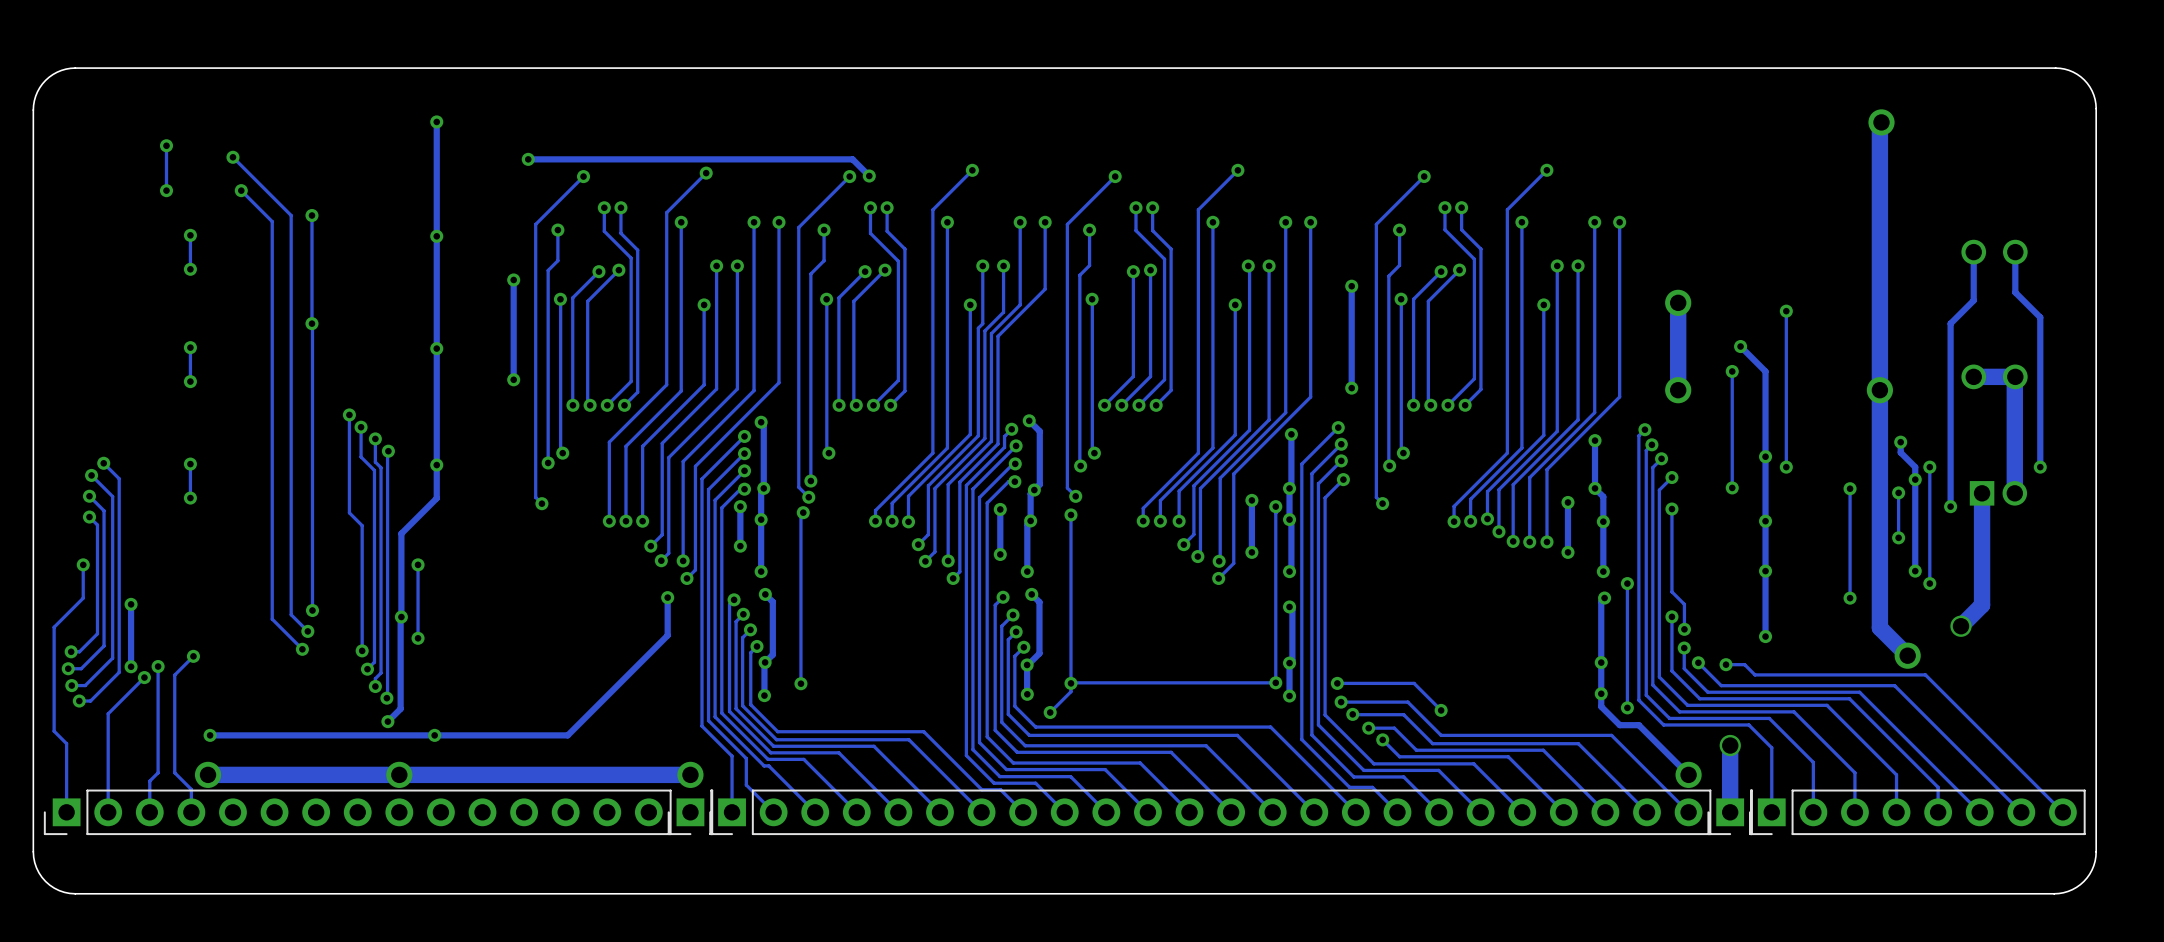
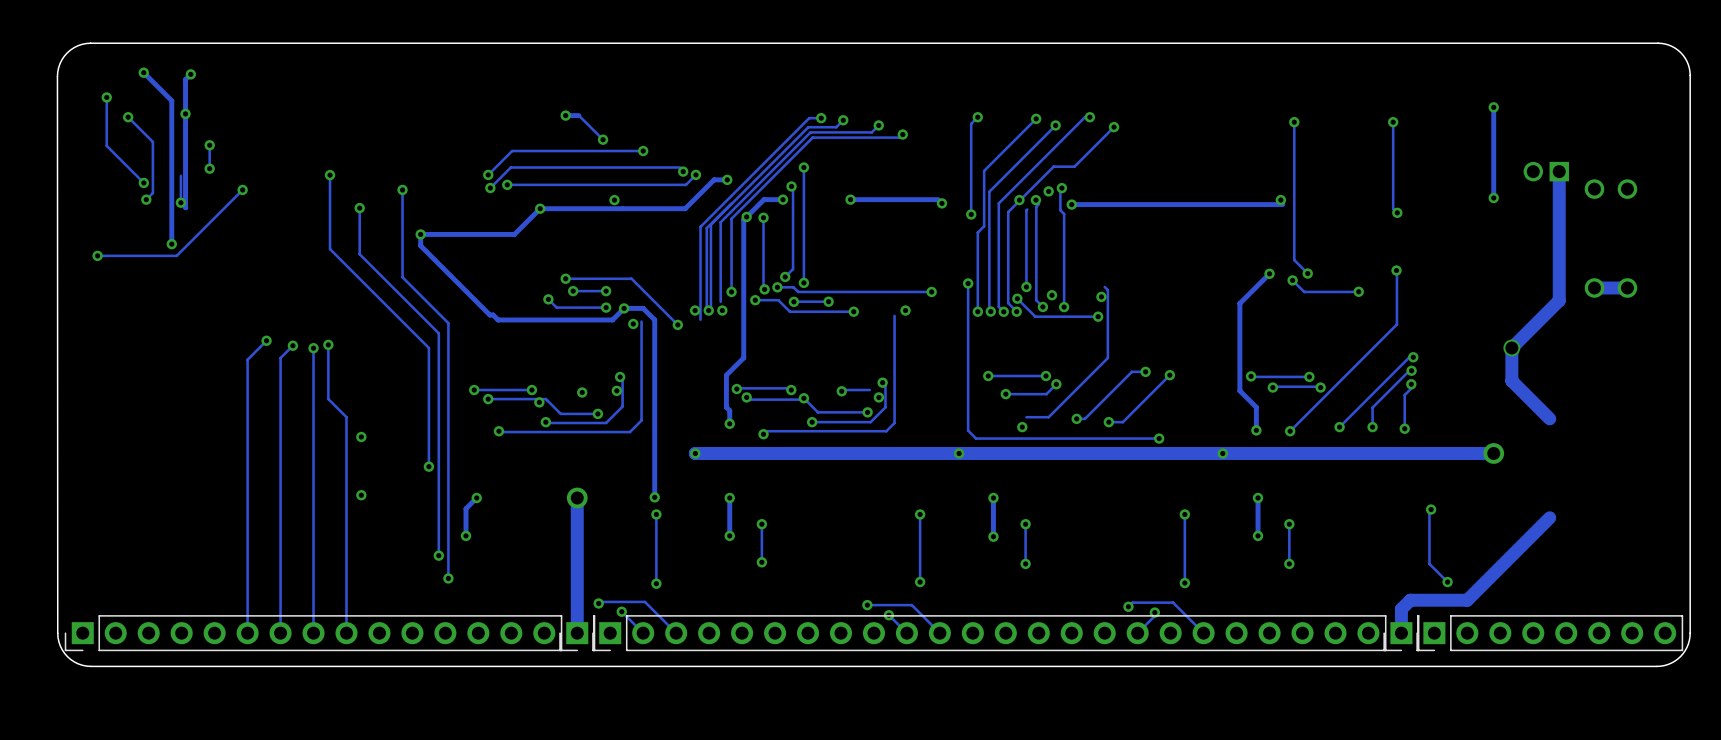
board edge: (2053, 68) (2069, 70) (2084, 79) (2092, 91) (2096, 108) (2096, 851) (2093, 865) (2089, 874) (2080, 884) (2072, 889) (2054, 893) (75, 893) (59, 890) (45, 881) (36, 867) (33, 851) (33, 110) (35, 96) (45, 80) (61, 70) (76, 68) -> (1658, 43) (1668, 45) (1680, 52) (1688, 64) (1690, 75) (1690, 633) (1686, 647) (1680, 656) (1671, 663) (1656, 666) (91, 666) (78, 663) (64, 653) (58, 641) (57, 633) (57, 76) (59, 63) (67, 52) (77, 45) (90, 43)
track: none -> (143, 72) (171, 100) (171, 244)
via: none -> (143, 72)
track: none -> (190, 74) (185, 79) (185, 207)
via: none -> (190, 74)
track: (436, 121) (436, 498) (401, 533) (400, 708) (387, 721) -> none
via: (436, 121) -> none
track: (1881, 122) (1879, 124) (1879, 627) (1907, 655) -> none
via: (1881, 122) -> none
track: none -> (106, 97) (106, 145) (143, 182)
via: none -> (106, 97)
track: (166, 145) (166, 190) -> none
via: (166, 145) -> none
track: none -> (1493, 107) (1493, 197)
via: none -> (1493, 107)
via: none -> (185, 113)
track: (232, 157) (291, 215) (291, 614) (307, 631) -> none
via: (232, 157) -> none
via: (528, 159) -> none
track: (675, 159) (528, 159) -> none
via: none -> (565, 115)
track: (692, 159) (852, 159) (869, 176) -> (578, 115) (603, 139)
track: none -> (128, 117) (152, 141) (152, 193) (146, 199)
via: none -> (128, 117)
track: none -> (977, 117) (971, 123) (971, 214)
via: none -> (977, 117)
track: none -> (1089, 117) (1084, 117) (998, 203) (998, 306) (1003, 311)
via: none -> (1089, 117)
track: none -> (821, 118) (809, 118) (700, 226) (700, 319)
via: none -> (821, 118)
track: none -> (1036, 118) (984, 170) (984, 226) (977, 232) (977, 311)
via: none -> (1036, 118)
track: none -> (843, 120) (836, 127) (808, 127) (710, 224) (711, 312)
via: none -> (843, 120)
track: none -> (1294, 122) (1294, 260) (1307, 273)
via: none -> (1294, 122)
track: none -> (1393, 122) (1393, 208) (1397, 212)
via: none -> (1393, 122)
track: (972, 170) (932, 209) (932, 453) (875, 510) (875, 521) -> none
via: (972, 170) -> none
track: (1237, 170) (1198, 209) (1198, 453) (1143, 508) (1143, 521) -> none
via: (1237, 170) -> none
track: (1546, 170) (1507, 209) (1507, 453) (1454, 506) (1454, 521) -> none
via: (1546, 170) -> none
track: none -> (878, 125) (871, 132) (810, 132) (720, 222) (720, 301)
via: none -> (878, 125)
track: none -> (1055, 125) (989, 191) (990, 311)
via: none -> (1055, 125)
track: (706, 173) (666, 212) (666, 384) (609, 442) (609, 521) -> none
via: (706, 173) -> none
track: none -> (1114, 127) (1074, 166) (1053, 166) (1008, 212) (1008, 303) (1016, 311)
via: none -> (1114, 127)
track: (583, 176) (535, 224) (535, 497) (541, 503) -> none
via: (583, 176) -> none
track: (849, 176) (798, 227) (798, 487) (808, 497) -> none
via: (849, 176) -> none
via: (869, 176) -> none
track: (1115, 176) (1067, 224) (1067, 488) (1075, 496) -> none
via position: (1115, 176) -> (902, 134)
track: (1424, 176) (1376, 224) (1376, 497) (1382, 503) -> none
via: (1424, 176) -> none
track: none -> (902, 134) (899, 137) (812, 137) (731, 218) (731, 291)
via: none -> (603, 139)
via: (166, 190) -> none
track: (241, 190) (272, 221) (272, 619) (302, 649) -> none
via position: (241, 190) -> (209, 145)
track: none -> (209, 145) (209, 168)
track: none -> (643, 151) (512, 151) (488, 174)
via: none -> (643, 151)
track: (604, 207) (604, 231) (631, 258) (631, 381) (607, 405) -> none
via: (604, 207) -> none
track: (620, 207) (620, 233) (637, 250) (637, 392) (624, 405) -> none
via: (620, 207) -> none
track: (870, 207) (870, 233) (898, 261) (898, 380) (873, 405) -> none
via: (870, 207) -> none
track: (887, 207) (887, 231) (904, 249) (904, 391) (890, 405) -> none
via: (887, 207) -> none
track: (1135, 207) (1135, 230) (1164, 259) (1164, 379) (1138, 405) -> none
via: (1135, 207) -> none
track: (1152, 207) (1152, 230) (1171, 249) (1171, 390) (1156, 405) -> none
via: (1152, 207) -> none
track: (1444, 207) (1444, 229) (1474, 259) (1474, 378) (1447, 405) -> none
via: (1444, 207) -> none
track: (1461, 207) (1461, 229) (1480, 249) (1480, 389) (1465, 405) -> none
via: (1461, 207) -> none
track: (311, 215) (312, 610) -> none
via: (311, 215) -> none
track: (681, 222) (681, 391) (625, 446) (625, 521) -> none
via: (681, 222) -> none
track: (754, 222) (754, 390) (683, 461) (683, 560) -> none
via: (754, 222) -> none
track: (778, 222) (778, 382) (695, 466) (695, 570) (686, 578) -> none
via: (778, 222) -> none
track: (947, 222) (947, 448) (892, 503) (892, 521) -> none
via: (947, 222) -> none
track: (1020, 222) (1020, 304) (991, 333) (991, 441) (948, 484) (948, 560) -> none
via: (1020, 222) -> none
track: (1045, 222) (1045, 289) (998, 336) (998, 443) (959, 482) (959, 571) (953, 578) -> none
via: (1045, 222) -> none
track: (1212, 222) (1212, 448) (1160, 500) (1160, 521) -> none
via: (1212, 222) -> none
track: (1285, 222) (1285, 412) (1220, 478) (1219, 561) -> none
via: (1285, 222) -> none
track: (1310, 222) (1310, 397) (1233, 473) (1233, 563) (1218, 578) -> none
via: (1310, 222) -> none
track: (1521, 222) (1521, 447) (1470, 499) (1470, 521) -> none
via: (1521, 222) -> none
track: (1594, 222) (1594, 412) (1529, 477) (1529, 541) -> none
via: (1594, 222) -> none
track: (1619, 222) (1619, 396) (1546, 469) (1546, 541) -> none
via: (1619, 222) -> none
track: none -> (680, 167) (510, 167) (490, 188)
track: none -> (803, 167) (803, 282)
via: none -> (803, 167)
via: none -> (209, 168)
track: (557, 230) (557, 260) (548, 270) (548, 462) -> none
via: (557, 230) -> none
track: (824, 230) (824, 260) (810, 273) (810, 481) -> none
track: (1089, 230) (1089, 265) (1079, 275) (1080, 465) -> none
via: (1089, 230) -> none
track: (1399, 230) (1399, 265) (1388, 276) (1389, 465) -> none
via: (1399, 230) -> none
track: none -> (1559, 171) (1559, 300) (1511, 347) (1511, 380) (1549, 418)
track: none -> (330, 175) (330, 249) (428, 347) (428, 466)
via: none -> (330, 175)
via: none -> (488, 174)
track: none -> (695, 174) (685, 184) (507, 184)
via: none -> (695, 174)
via: (190, 235) -> none
via: (436, 236) -> none
track: none -> (727, 179) (714, 179) (685, 208) (540, 208) (514, 234) (420, 234) (420, 245) (489, 315) (493, 315) (498, 319) (612, 319) (624, 308) (643, 308) (654, 319) (654, 497)
via: none -> (727, 179)
via: none -> (143, 182)
via: none -> (507, 184)
track: none -> (791, 186) (793, 269) (785, 276)
via: none -> (791, 186)
via: none -> (490, 188)
track: none -> (1061, 188) (1060, 210) (1064, 214) (1064, 307)
via: none -> (1061, 188)
track: (1973, 252) (1973, 300) (1950, 323) (1950, 506) -> none
track: (2015, 252) (2015, 292) (2040, 317) (2040, 467) -> none
track: none -> (242, 189) (176, 255) (97, 255)
via: none -> (242, 189)
track: none -> (402, 189) (402, 277) (448, 323) (448, 578)
via: none -> (402, 189)
via: none -> (1048, 191)
via: none -> (1493, 197)
via: none -> (146, 199)
track: (716, 265) (716, 388) (662, 443) (662, 534) (650, 546) -> none
via: (716, 265) -> none
track: (737, 265) (737, 388) (668, 457) (668, 553) (661, 560) -> none
track: none -> (782, 199) (763, 199) (743, 219) (743, 357) (726, 375) (726, 407) (729, 410) (729, 423)
via: none -> (782, 199)
track: (982, 265) (982, 323) (978, 328) (978, 435) (928, 485) (928, 534) (918, 544) -> none
via: (982, 265) -> none
track: (1003, 265) (1003, 312) (984, 330) (984, 438) (934, 488) (934, 551) (925, 561) -> none
via: (1003, 265) -> none
via: none -> (850, 199)
track: none -> (938, 199) (850, 199)
track: (1248, 265) (1249, 430) (1193, 485) (1193, 534) (1183, 544) -> none
track: (1269, 265) (1269, 419) (1200, 488) (1200, 553) (1197, 556) -> none
track: (1557, 265) (1557, 431) (1498, 489) (1498, 531) -> none
via: (1557, 265) -> none
track: (1578, 265) (1578, 419) (1513, 484) (1513, 541) -> none
track: (618, 270) (587, 301) (587, 402) (590, 405) -> none
via: (618, 270) -> none
via: (885, 270) -> none
track: (1150, 270) (1150, 376) (1121, 405) -> none
track: (1459, 270) (1428, 301) (1428, 402) (1430, 405) -> none
via: (1459, 270) -> none
track: (598, 271) (572, 297) (572, 405) -> none
via: (598, 271) -> none
track: (865, 271) (838, 297) (838, 405) -> none
via: (865, 271) -> none
track: (1133, 271) (1133, 376) (1104, 405) -> none
via: (1133, 271) -> none
track: none -> (1039, 204) (1036, 206) (1036, 300) (1042, 306)
via: none -> (1071, 204)
track: (1441, 271) (1413, 299) (1413, 405) -> none
via: (1441, 271) -> none
track: none -> (1282, 204) (1071, 204)
track: none -> (359, 208) (359, 254) (438, 333) (438, 555)
via: none -> (359, 208)
via: none -> (540, 208)
track: none -> (1027, 209) (1026, 287)
track: (513, 279) (513, 379) -> none
via: (513, 279) -> none
via: none -> (1397, 212)
via: none -> (971, 214)
track: (1351, 286) (1351, 388) -> none
via: (1351, 286) -> none
via: none -> (746, 216)
track: none -> (763, 217) (764, 289)
via: none -> (763, 217)
track: (560, 299) (560, 451) (562, 453) -> none
via: (560, 299) -> none
track: (826, 299) (826, 451) (828, 453) -> none
via: (826, 299) -> none
track: (1092, 299) (1092, 451) (1094, 453) -> none
via: (1092, 299) -> none
track: (1401, 299) (1401, 451) (1403, 453) -> none
via: (1401, 299) -> none
track: (1678, 302) (1678, 390) -> none
via: (1678, 302) -> none
track: (704, 304) (704, 384) (642, 446) (642, 521) -> none
via: (704, 304) -> none
track: (970, 304) (970, 434) (908, 496) (908, 521) -> none
via: (970, 304) -> none
track: (1235, 304) (1235, 434) (1179, 491) (1179, 521) -> none
via: (1235, 304) -> none
track: (1543, 304) (1543, 435) (1487, 491) (1487, 518) -> none
via: (1543, 304) -> none
via: none -> (420, 234)
track: (1786, 311) (1786, 467) -> none
via: (1786, 311) -> none
via: (311, 323) -> none
via: none -> (97, 255)
track: (1740, 346) (1765, 371) (1765, 636) -> none
via: (1740, 346) -> none
track: (190, 347) (190, 381) -> none
via position: (190, 347) -> (171, 244)
via: (436, 348) -> none
track: none -> (1396, 270) (1396, 324) (1290, 431)
via: none -> (1396, 270)
track: none -> (1269, 273) (1239, 303) (1239, 390) (1256, 407) (1256, 430)
via: none -> (1269, 273)
via: none -> (1307, 273)
via: none -> (785, 276)
track: none -> (565, 278) (631, 278) (677, 324)
via: none -> (565, 278)
track: none -> (1292, 280) (1304, 291) (1358, 291)
via: none -> (1292, 280)
via: none -> (803, 282)
track: none -> (968, 283) (968, 430) (976, 438) (1159, 438)
via: none -> (968, 283)
track: (1732, 371) (1732, 487) -> none
via: (1732, 371) -> none
via: none -> (1026, 287)
track: none -> (1104, 287) (1107, 290) (1107, 358) (1048, 417) (1026, 417)
track: none -> (777, 287) (793, 287) (798, 291) (931, 291)
via: none -> (777, 287)
via size: [1665, 377, 1692, 404] -> [1353, 286, 1364, 297]
track: (2014, 377) (2014, 493) -> none
via: none -> (764, 289)
via: (513, 379) -> none
via: none -> (573, 291)
track: none -> (606, 291) (573, 291)
via: none -> (606, 291)
via: (190, 381) -> none
via: none -> (731, 291)
via: none -> (931, 291)
via: none -> (1051, 295)
track: none -> (1017, 298) (1035, 316) (1098, 316)
via: none -> (1017, 298)
via: (1879, 390) -> none
track: none -> (548, 299) (556, 307) (606, 307)
via: none -> (548, 299)
track: none -> (755, 300) (778, 300) (789, 311) (853, 311)
via: none -> (755, 300)
via: none -> (793, 301)
track: none -> (828, 301) (794, 301)
via: none -> (828, 301)
via: none -> (1042, 306)
via: none -> (1064, 307)
via: none -> (606, 307)
via: none -> (624, 308)
via: (572, 405) -> none
via: (590, 405) -> none
via: (607, 405) -> none
via: (624, 405) -> none
via: (890, 405) -> none
via: (1121, 405) -> none
via: (1138, 405) -> none
via: (1156, 405) -> none
via: (1413, 405) -> none
via: (1430, 405) -> none
via: (1447, 405) -> none
via: (1465, 405) -> none
via: none -> (853, 311)
via: none -> (977, 311)
via: none -> (990, 311)
via: none -> (1003, 311)
via: none -> (1016, 311)
track: none -> (894, 315) (894, 422) (886, 431) (762, 431)
via: none -> (1098, 316)
track: (349, 414) (349, 512) (362, 525) (362, 650) -> none
via: (349, 414) -> none
track: none -> (641, 321) (641, 420) (630, 432) (498, 431)
track: (1029, 420) (1039, 431) (1039, 484) (1030, 493) (1030, 520) (1027, 524) (1027, 571) -> none
via: (1029, 420) -> none
track: (761, 422) (763, 424) (761, 571) -> none
via: none -> (677, 324)
track: (361, 427) (361, 457) (374, 470) (374, 662) (367, 669) -> none
via: (361, 427) -> none
track: (1338, 427) (1301, 464) (1301, 739) (1349, 787) (1372, 787) (1397, 812) -> (1154, 612) (1154, 616) (1137, 633)
via: (1338, 427) -> none
track: (1011, 429) (1004, 436) (1004, 447) (966, 485) (966, 755) (994, 783) (1035, 783) (1064, 812) -> none
via: (1011, 429) -> none
track: (1644, 429) (1638, 435) (1638, 700) (1663, 724) (1748, 724) (1771, 747) (1771, 812) -> none
via: (1644, 429) -> none
track: (1291, 434) (1291, 486) (1289, 488) (1291, 569) (1289, 571) -> none
via: (1291, 434) -> none
track: (744, 436) (701, 478) (701, 726) (732, 756) (732, 812) -> none
via: (744, 436) -> none
track: (375, 438) (375, 462) (381, 467) (381, 672) (375, 678) (375, 686) -> none
via: (375, 438) -> none
track: (1595, 440) (1595, 488) (1603, 496) (1603, 571) -> none
via: (1595, 440) -> none
track: (1900, 442) (1900, 452) (1915, 467) (1915, 571) -> none
via: (1900, 442) -> none
track: none -> (266, 340) (247, 359) (247, 633)
via: none -> (266, 340)
track: (1341, 444) (1311, 473) (1311, 735) (1353, 776) (1403, 776) (1439, 812) -> none
via: (1341, 444) -> none
track: (1651, 444) (1646, 450) (1646, 695) (1669, 718) (1769, 718) (1813, 762) (1813, 812) -> none
via: (1651, 444) -> none
track: (1016, 445) (972, 489) (972, 749) (999, 776) (1070, 776) (1083, 789) -> none
via: (1016, 445) -> none
track: none -> (328, 344) (328, 399) (346, 417) (346, 633)
via: none -> (328, 344)
track: none -> (292, 345) (280, 358) (280, 633)
via: none -> (292, 345)
track: none -> (311, 346) (313, 348) (313, 633)
track: (388, 451) (386, 698) -> none
via: (388, 451) -> none
via: none -> (313, 348)
via: none -> (1511, 347)
via: (562, 453) -> none
track: (744, 453) (708, 489) (708, 720) (746, 758) (746, 785) -> none
via: (744, 453) -> none
via: (828, 453) -> none
via: (1094, 453) -> none
via: (1403, 453) -> none
via: (1765, 456) -> none
track: (1661, 458) (1652, 467) (1652, 685) (1679, 711) (1794, 711) (1854, 772) (1854, 812) -> none
via: (1661, 458) -> none
track: (1341, 460) (1318, 483) (1318, 724) (1363, 770) (1438, 770) (1442, 773) -> (1128, 606) (1132, 602) (1173, 602)
via: (1341, 460) -> none
via: (548, 462) -> none
track: (103, 463) (119, 478) (119, 672) (90, 701) (79, 701) -> none
via: (103, 463) -> none
track: (1015, 463) (979, 497) (979, 742) (1006, 769) (1105, 769) (1112, 776) -> (867, 605) (911, 605)
via: (1015, 463) -> none
track: (190, 464) (190, 498) -> none
via: (190, 464) -> none
track: none -> (1413, 357) (1409, 357) (1339, 427)
via: none -> (1413, 357)
via: (436, 465) -> none
via: (1080, 465) -> none
via: (1389, 465) -> none
via: (1786, 467) -> none
track: (1929, 467) (1929, 583) -> none
via: (1929, 467) -> none
via: (2040, 467) -> none
track: (744, 470) (715, 500) (715, 716) (764, 765) (768, 765) (775, 772) -> (598, 603) (644, 601)
via: (744, 470) -> none
track: (91, 475) (112, 496) (112, 658) (85, 685) (71, 685) -> none
via: (91, 475) -> none
track: (1671, 477) (1659, 490) (1659, 677) (1687, 705) (1826, 705) (1896, 774) (1896, 812) -> none
via: (1671, 477) -> none
track: (1343, 479) (1325, 497) (1325, 714) (1373, 763) (1473, 763) (1522, 812) -> none
via: (1343, 479) -> none
via: (1915, 479) -> none
via: (810, 481) -> none
track: (1014, 481) (1008, 481) (987, 503) (987, 736) (1013, 763) (1140, 763) (1189, 812) -> none
via: (1014, 481) -> none
track: none -> (1411, 370) (1409, 370) (1372, 407) (1372, 427)
via: none -> (1411, 370)
track: none -> (1145, 371) (1131, 371) (1084, 418) (1076, 418)
via: none -> (1145, 371)
track: none -> (619, 373) (622, 376) (622, 406) (606, 422) (548, 422)
track: none -> (1169, 375) (1122, 422) (1108, 422)
via: none -> (1169, 375)
via: none -> (988, 376)
track: none -> (1045, 376) (988, 376)
via: none -> (1045, 376)
via: (1732, 487) -> none
via: (763, 488) -> none
via: (1289, 488) -> none
track: none -> (1251, 376) (1309, 376)
via: none -> (1251, 376)
via: (1595, 488) -> none
track: (1850, 488) (1850, 598) -> none
via: (1850, 488) -> none
track: (744, 489) (740, 489) (721, 507) (721, 713) (768, 759) (803, 759) (856, 812) -> none
via: none -> (1309, 376)
via: (1034, 490) -> none
track: (1898, 492) (1898, 537) -> none
via: (1898, 492) -> none
track: (1982, 493) (1982, 605) (1961, 626) -> none
part rotation: 0° (1998, 493) -> 180° (1546, 171)
part position: (1998, 493) -> (1546, 171)
track: none -> (885, 381) (885, 407) (870, 422) (812, 422)
track: (89, 496) (104, 510) (104, 645) (81, 668) (68, 668) -> none
via: (89, 496) -> none
via: (808, 497) -> none
via: (190, 498) -> none
track: none -> (1056, 384) (1046, 394) (1005, 394)
via: none -> (1056, 384)
track: none -> (1411, 384) (1411, 388) (1404, 395) (1404, 428)
via: none -> (1411, 384)
track: (1251, 500) (1251, 552) -> none
via: (1251, 500) -> none
track: none -> (1276, 386) (1320, 387)
track: (1567, 502) (1567, 552) -> (1289, 524) (1289, 563)
via: none -> (1320, 387)
via position: (541, 503) -> (474, 390)
via: (1382, 503) -> none
track: none -> (736, 389) (789, 388) (791, 390)
via: none -> (736, 389)
track: none -> (531, 390) (474, 390)
via: none -> (531, 390)
via: none -> (791, 390)
track: none -> (869, 390) (841, 391)
track: (740, 506) (740, 546) -> none
track: (1275, 506) (1278, 509) (1275, 512) (1275, 682) (1070, 683) -> none
via: (1275, 506) -> none
via: (1950, 506) -> none
via: none -> (841, 391)
via: none -> (582, 392)
track: (1000, 509) (1000, 554) -> none
via: (1000, 509) -> none
track: (1671, 509) (1671, 591) (1684, 604) (1684, 629) -> none
via: (1671, 509) -> none
via: none -> (1005, 394)
track: (803, 512) (800, 514) (800, 683) -> none
via: (803, 512) -> none
track: none -> (746, 397) (748, 399) (803, 398) (818, 412) (867, 412)
via: none -> (746, 397)
track: (1070, 514) (1070, 691) (1050, 712) -> none
via: none -> (803, 398)
track: (89, 517) (97, 525) (97, 633) (79, 651) (71, 651) -> none
via: (89, 517) -> none
track: none -> (488, 399) (545, 399) (560, 413) (597, 413)
via: none -> (488, 399)
via: (1487, 518) -> none
via: (761, 519) -> none
via: (1289, 519) -> none
via: (1030, 520) -> none
via: (609, 521) -> none
via: (625, 521) -> none
via: (875, 521) -> none
via: (892, 521) -> none
via: (908, 521) -> none
via: (1143, 521) -> none
via: (1160, 521) -> none
via: (1179, 521) -> none
via: (1454, 521) -> none
via: (1470, 521) -> none
via: (1603, 521) -> none
via: (1765, 521) -> none
via: (1498, 531) -> none
via: none -> (867, 412)
via: none -> (597, 413)
via: (1898, 537) -> none
via: none -> (1076, 418)
via: (1513, 541) -> none
via: (1529, 541) -> none
via: (1546, 541) -> none
via: (918, 544) -> none
via: (1183, 544) -> none
via: (740, 546) -> none
via: none -> (1108, 422)
via: none -> (729, 423)
via: (1567, 552) -> none
via: none -> (1339, 427)
via: none -> (1372, 427)
via position: (1000, 554) -> (812, 422)
via: none -> (1404, 428)
via: (1197, 556) -> none
via: none -> (1256, 430)
via: none -> (498, 431)
via: none -> (1290, 431)
via: (661, 560) -> none
via: (683, 560) -> none
via: (948, 560) -> none
via: (1219, 561) -> none
track: (83, 564) (83, 598) (54, 627) (54, 731) (66, 743) (66, 812) -> none
via: (83, 564) -> none
track: (418, 564) (418, 638) -> none
via: none -> (1159, 438)
via: (761, 571) -> none
via: (1027, 571) -> none
via: (1289, 571) -> none
via: (1603, 571) -> none
via: (1765, 571) -> none
via: (1915, 571) -> none
via: (686, 578) -> none
via: (953, 578) -> none
via: (1218, 578) -> none
track: (1627, 583) (1627, 707) -> none
via: (1627, 583) -> none
via: (1929, 583) -> none
via: none -> (695, 453)
via: none -> (959, 453)
via: none -> (1222, 453)
track: none -> (1493, 453) (695, 453)
track: (765, 594) (772, 601) (772, 654) (764, 663) (764, 695) -> none
via: (765, 594) -> none
track: (1031, 594) (1039, 602) (1039, 653) (1027, 664) (1027, 694) -> none
via: (1031, 594) -> none
track: (667, 597) (667, 635) (567, 735) (210, 735) -> none
via: (667, 597) -> none
track: (1003, 597) (995, 605) (995, 730) (1017, 752) (1171, 752) (1231, 812) -> none
via: (1003, 597) -> none
track: (1604, 598) (1601, 601) (1601, 706) (1619, 725) (1638, 725) (1688, 774) -> none
via: (1604, 598) -> none
via: (1850, 598) -> none
track: (734, 599) (729, 604) (729, 711) (770, 752) (838, 752) (898, 812) -> none
via: (734, 599) -> none
via: none -> (428, 466)
track: (131, 604) (131, 666) -> none
via: (131, 604) -> none
track: (1289, 606) (1292, 609) (1292, 660) (1289, 663) (1289, 696) -> none
via: (1289, 606) -> none
via: (312, 610) -> none
track: (743, 614) (736, 621) (736, 708) (773, 746) (873, 746) (939, 812) -> none
via: (743, 614) -> none
track: (1013, 615) (1001, 626) (1001, 722) (1025, 745) (1206, 745) (1272, 812) -> none
via: (1013, 615) -> none
track: (1671, 616) (1671, 670) (1699, 698) (1849, 698) (1938, 787) (1938, 812) -> none
via: (1671, 616) -> none
via: (401, 617) -> none
via: (1961, 626) -> none
track: (750, 629) (742, 637) (742, 705) (776, 739) (908, 739) (981, 812) -> none
via: (750, 629) -> none
via: (1684, 629) -> none
via: (307, 631) -> none
track: (1016, 631) (1008, 639) (1008, 714) (1029, 735) (1237, 735) (1314, 812) -> none
via: (1016, 631) -> none
via position: (1765, 636) -> (1431, 509)
via: none -> (654, 497)
track: none -> (476, 497) (466, 508) (466, 535)
via: none -> (476, 497)
track: none -> (577, 497) (577, 633)
via: none -> (577, 497)
track: none -> (729, 497) (729, 535)
via: none -> (729, 497)
track: none -> (993, 497) (993, 536)
via: none -> (993, 497)
track: none -> (1258, 497) (1258, 535)
via: none -> (1258, 497)
track: (756, 646) (750, 652) (750, 704) (777, 731) (923, 731) (981, 789) (1000, 789) (1023, 812) -> none
via: (756, 646) -> none
track: (1023, 647) (1014, 656) (1014, 706) (1035, 727) (1270, 727) (1355, 812) -> none
via: (1023, 647) -> none
track: (1684, 648) (1684, 668) (1707, 692) (1859, 692) (1979, 812) -> none
via: (1684, 648) -> none
via: (302, 649) -> none
via: (362, 650) -> none
via: (71, 651) -> none
via position: (1907, 655) -> (1493, 453)
track: (193, 656) (174, 675) (174, 772) (191, 789) (191, 812) -> none
via: (193, 656) -> none
track: none -> (1431, 509) (1429, 511) (1429, 563) (1447, 582)
via: (765, 662) -> none
track: none -> (656, 514) (656, 583)
via: none -> (656, 514)
track: none -> (920, 514) (920, 582)
via: none -> (920, 514)
track: none -> (1184, 514) (1184, 583)
via: none -> (1184, 514)
via: (1601, 662) -> none
track: (1698, 662) (1721, 685) (1894, 685) (2021, 812) -> none
via: (1698, 662) -> none
via: (1289, 663) -> none
via: (1027, 664) -> none
track: (1726, 664) (1744, 664) (1754, 674) (1925, 674) (2062, 812) -> none
via: (1726, 664) -> none
via: (131, 666) -> none
track: (158, 666) (158, 772) (149, 781) (149, 812) -> none
via: (158, 666) -> none
via: (68, 668) -> none
via: (367, 669) -> none
track: none -> (761, 524) (761, 562)
via: none -> (761, 524)
track: none -> (1025, 524) (1025, 563)
via: none -> (1025, 524)
via: none -> (1289, 524)
track: (144, 677) (108, 713) (108, 812) -> none
via: (144, 677) -> none
via: (1275, 682) -> none
via: (800, 683) -> none
via: (1070, 683) -> none
track: (1337, 683) (1414, 683) (1441, 710) -> none
via: (1337, 683) -> none
via: (71, 685) -> none
via: (375, 686) -> none
via: none -> (466, 535)
via: none -> (729, 535)
via: none -> (1258, 535)
via: none -> (993, 536)
via: (1601, 693) -> none
via: (1027, 694) -> none
via: (764, 695) -> none
via: (1289, 696) -> none
via: (386, 698) -> none
via: (79, 701) -> none
track: (1341, 702) (1407, 702) (1441, 735) (1611, 735) (1688, 812) -> none
via: (1341, 702) -> none
via: (1627, 707) -> none
via: (1441, 710) -> none
via: (1050, 712) -> none
via: none -> (438, 555)
track: (1352, 714) (1403, 714) (1432, 743) (1578, 743) (1647, 812) -> none
via: (1352, 714) -> none
via: (387, 721) -> none
via: none -> (761, 562)
via: none -> (1025, 563)
via: none -> (1289, 563)
track: (1368, 728) (1394, 728) (1416, 750) (1543, 750) (1605, 812) -> none
via: (1368, 728) -> none
via: (210, 735) -> none
via: (434, 735) -> none
track: (1382, 739) (1399, 756) (1508, 756) (1563, 812) -> none
via: (1382, 739) -> none
via: none -> (448, 578)
track: (1730, 745) (1730, 782) -> (1549, 517) (1467, 600) (1410, 600) (1401, 609)
via: (1730, 745) -> none
via: none -> (920, 582)
via: none -> (1447, 582)
via: none -> (656, 583)
via: none -> (1184, 583)
via: (208, 774) -> none
via: (399, 774) -> none
track: (690, 774) (208, 774) -> none
via: (690, 774) -> none
via: none -> (598, 603)
via: (1688, 774) -> none
via: none -> (867, 605)
via: none -> (1128, 606)
via: none -> (621, 611)
via: none -> (1154, 612)
via: none -> (888, 615)

